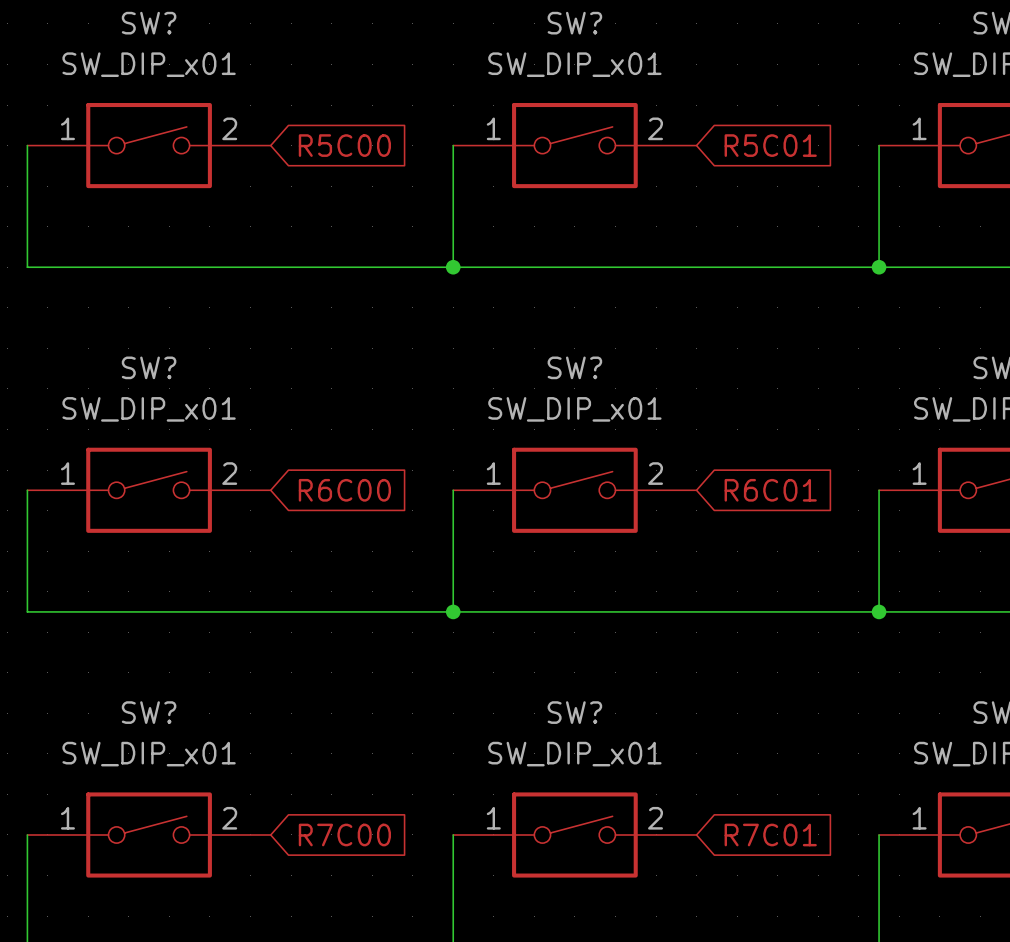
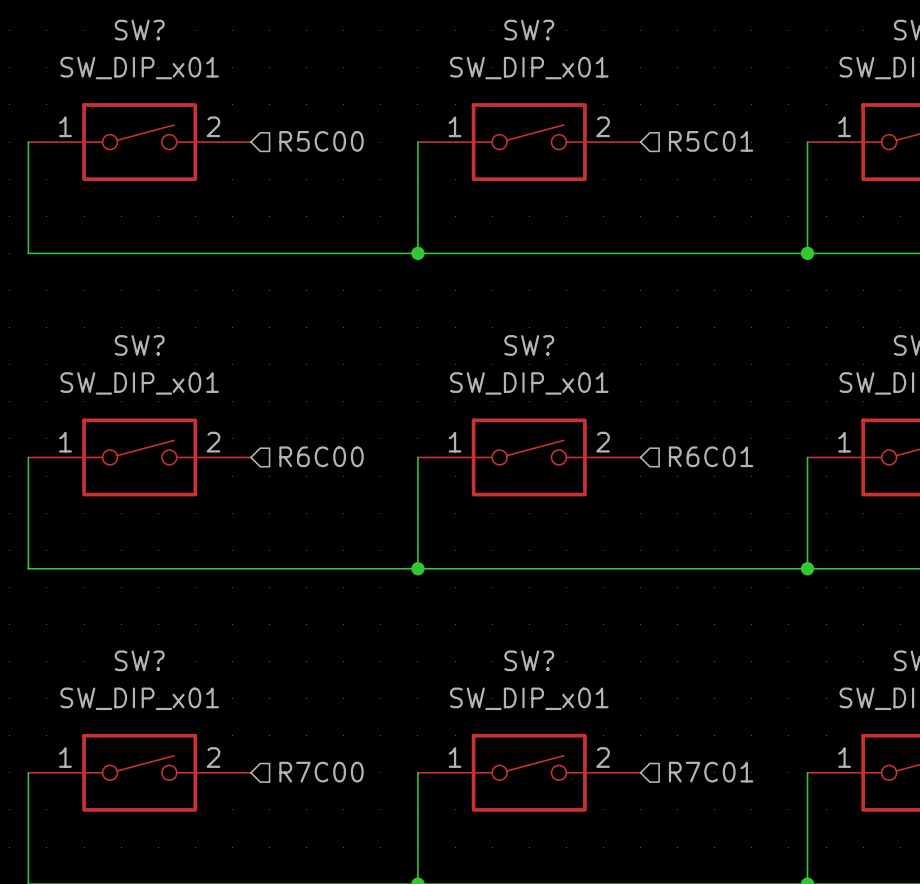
hierarchical label: none -> R5C00 (321, 141)
hierarchical label: none -> R5C01 (711, 141)
global label: R5C00 (344, 145) -> none
global label: R5C01 (770, 145) -> none
hierarchical label: none -> R6C00 (321, 456)
hierarchical label: none -> R6C01 (711, 456)
global label: R6C00 (344, 490) -> none
global label: R6C01 (770, 490) -> none
global label: R7C00 (344, 834) -> none
hierarchical label: none -> R7C00 (321, 772)
global label: R7C01 (770, 834) -> none
hierarchical label: none -> R7C01 (711, 772)

